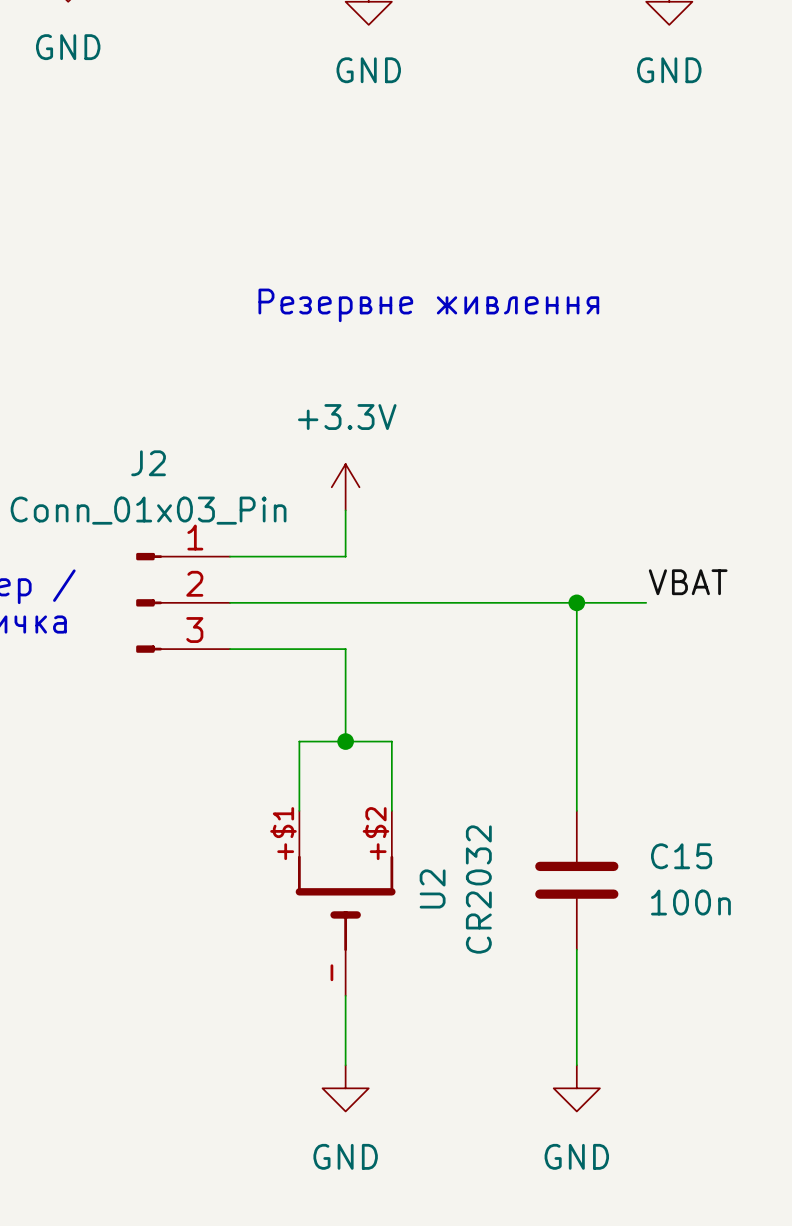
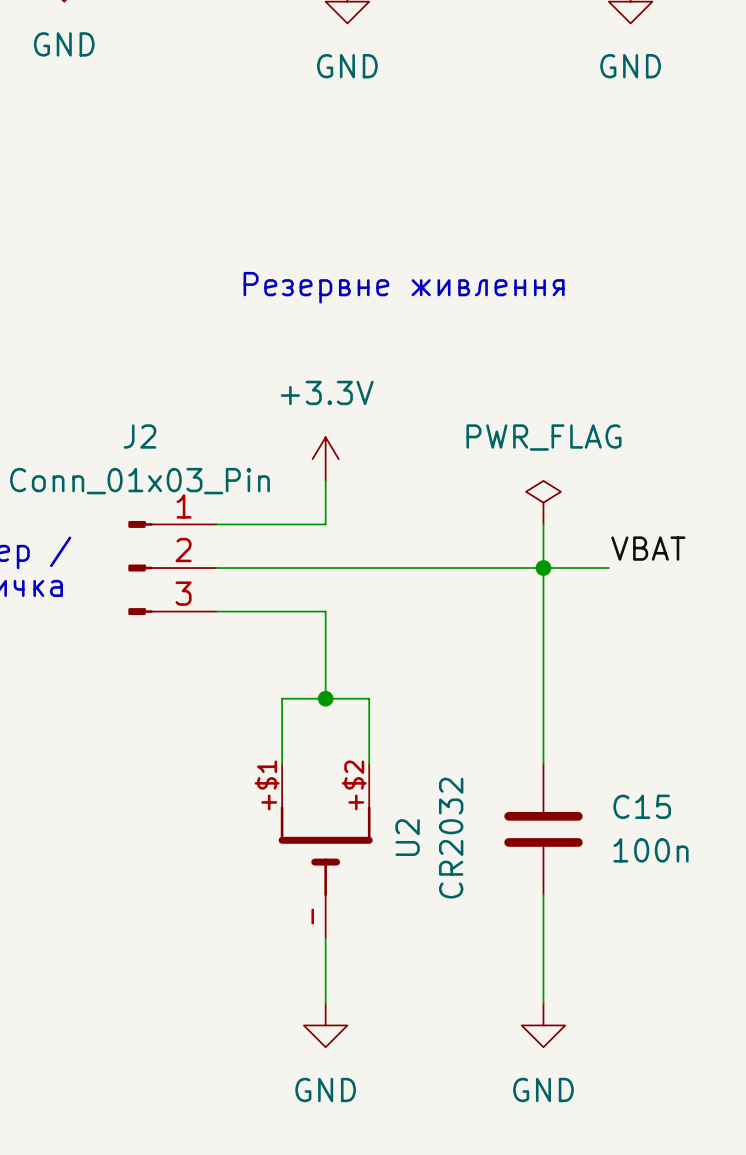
power symbol: none -> PWR_FLAG (543, 502)
wire: none -> (543, 524) (543, 568)

